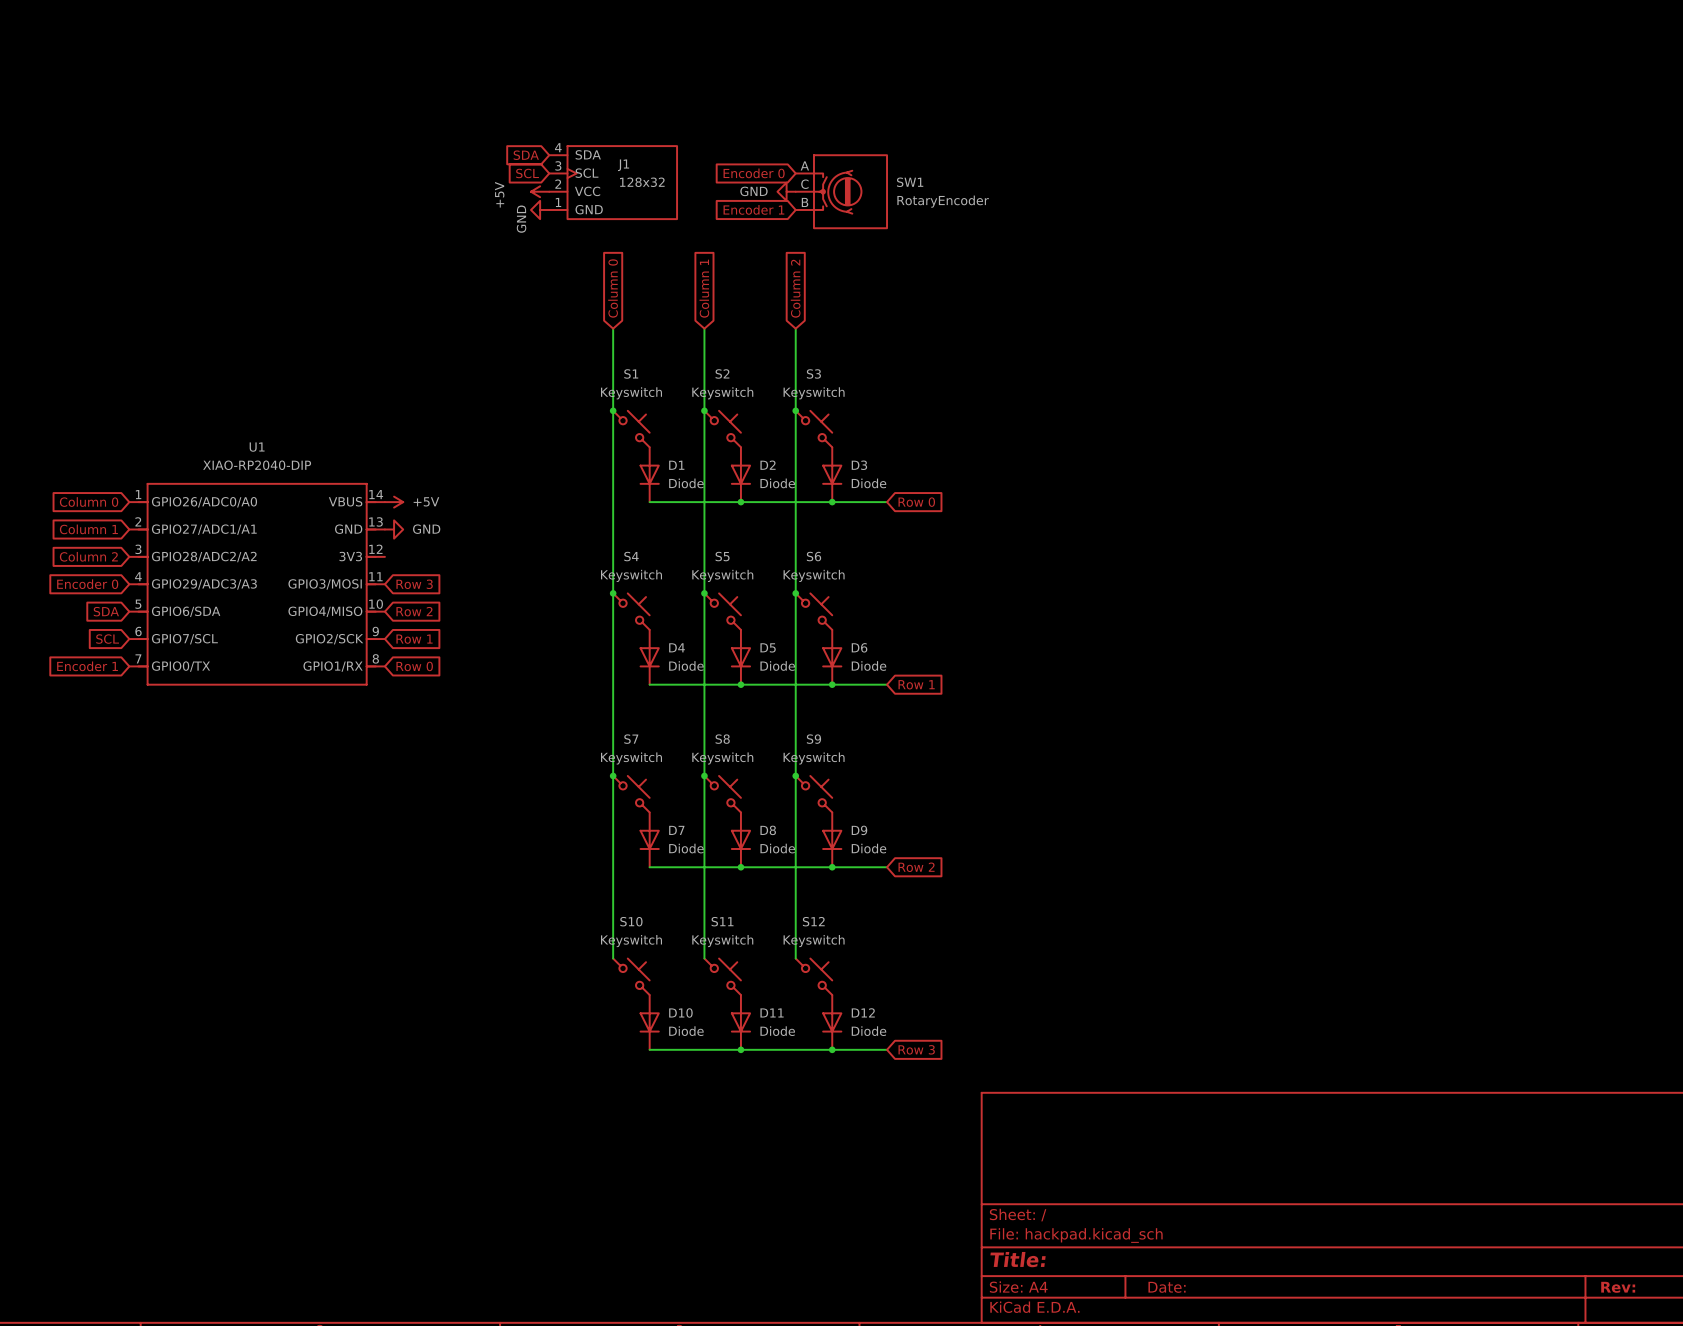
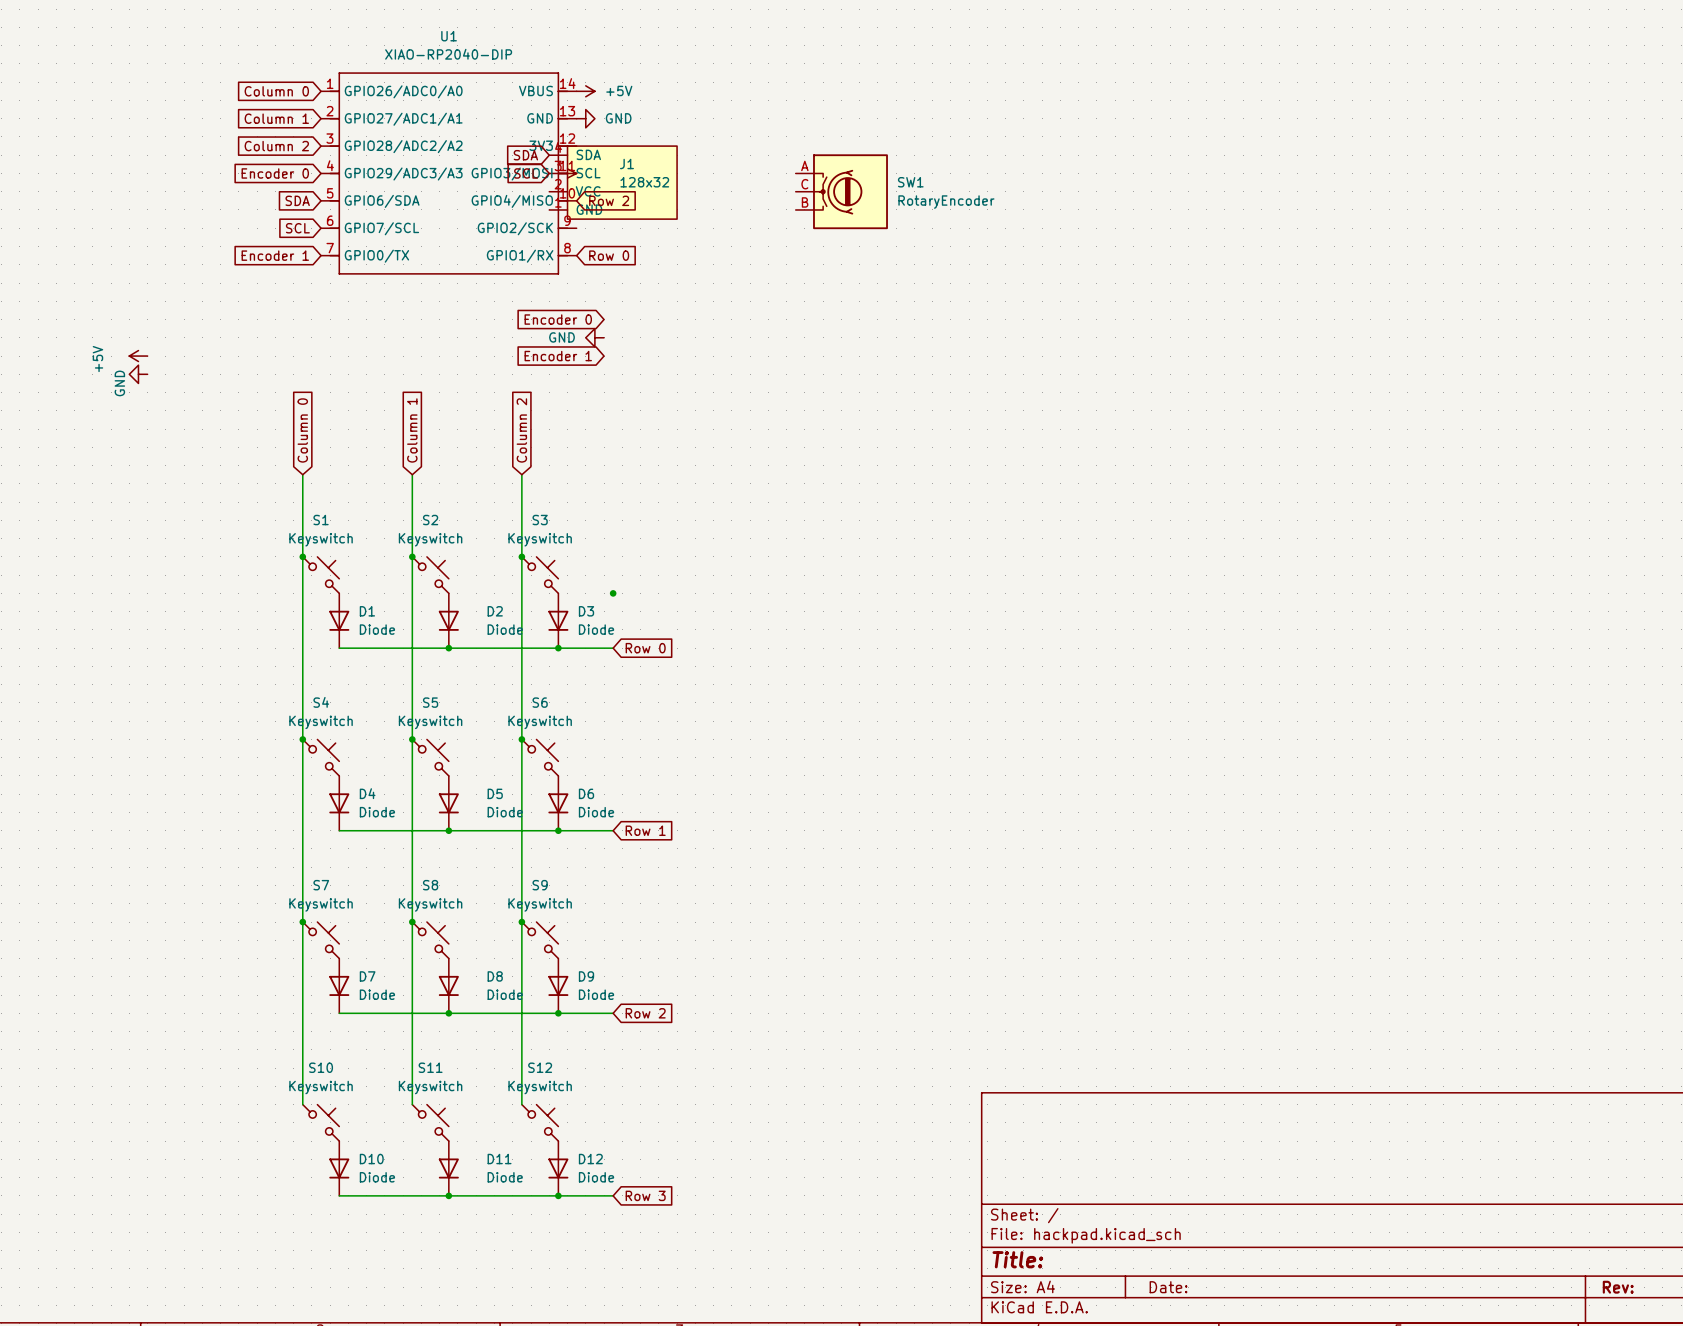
global label: none -> Column 0 (276, 91)
global label: none -> Column 1 (276, 118)
power symbol: none -> GND (585, 118)
global label: none -> Column 2 (276, 146)
global label: none -> Encoder 0 (275, 173)
global label: Encoder 0 (754, 173) -> none
power symbol rotation: 0° (540, 191) -> 180° (585, 91)
power symbol position: +5V (540, 191) -> +5V (585, 91)
power symbol: GND (786, 191) -> none
global label: none -> SDA (297, 200)
global label: none -> Row 2 (609, 200)
power symbol: GND (540, 209) -> none
global label: Encoder 1 (753, 209) -> none
global label: none -> SCL (297, 228)
global label: none -> Encoder 1 (275, 255)
global label: none -> Row 0 (609, 255)
global label: Column 0 (613, 288) -> none
global label: Column 1 (704, 288) -> none
global label: Column 2 (795, 288) -> none
global label: none -> Encoder 0 (558, 319)
wire: (613, 328) (613, 958) -> (521, 474) (521, 1104)
wire: (704, 328) (704, 958) -> none
wire: (795, 328) (795, 958) -> none
power symbol: none -> GND (594, 337)
global label: none -> Encoder 1 (558, 356)
power symbol: none -> +5V (138, 356)
power symbol: none -> GND (138, 374)
junction: (613, 410) -> none
junction: (704, 410) -> none
junction: (795, 410) -> none
S1 position: (631, 429) -> (321, 575)
S2 position: (722, 429) -> (430, 575)
S3 position: (813, 429) -> (540, 575)
global label: none -> Column 0 (302, 430)
global label: none -> Column 1 (412, 430)
global label: none -> Column 2 (521, 430)
D2 name position: D2 (768, 465) -> D2 (495, 611)
wire: none -> (302, 474) (302, 1104)
wire: none -> (412, 474) (412, 1104)
D1 position: (649, 474) -> (339, 620)
D2 position: (740, 474) -> (448, 620)
D3 position: (832, 474) -> (558, 620)
D2 value position: Diode (777, 483) -> Diode (505, 629)
global label: Column 0 (89, 502) -> none
power symbol: +5V (394, 502) -> none
wire: (649, 502) (887, 502) -> none
junction: (740, 502) -> none
junction: (832, 502) -> none
global label: Row 0 (916, 502) -> none
global label: Column 1 (88, 529) -> none
power symbol: GND (394, 529) -> none
global label: Column 2 (88, 556) -> none
junction: none -> (302, 556)
junction: none -> (412, 556)
junction: none -> (521, 556)
global label: Encoder 0 (87, 584) -> none
U1 position: (257, 584) -> (448, 173)
global label: Row 3 (414, 584) -> none
junction: (704, 593) -> none
junction: (795, 593) -> none
global label: SDA (106, 611) -> none
global label: Row 2 (414, 611) -> none
S4 position: (631, 611) -> (321, 757)
S5 position: (722, 611) -> (430, 757)
S6 position: (813, 611) -> (540, 757)
global label: SCL (107, 639) -> none
global label: Row 1 (414, 639) -> none
D5 name position: D5 (768, 647) -> D5 (495, 793)
wire: none -> (339, 648) (613, 648)
junction: none -> (448, 648)
junction: none -> (558, 648)
global label: none -> Row 0 (645, 648)
D4 position: (649, 657) -> (339, 803)
D5 position: (740, 657) -> (448, 803)
D6 position: (832, 657) -> (558, 803)
D5 value position: Diode (777, 665) -> Diode (505, 812)
global label: Encoder 1 (87, 666) -> none
global label: Row 0 (414, 666) -> none
wire: (649, 684) (887, 684) -> none
junction: (740, 684) -> none
junction: (832, 684) -> none
global label: Row 1 (916, 684) -> none
junction: none -> (302, 739)
junction: none -> (412, 739)
junction: none -> (521, 739)
junction: (613, 775) -> none
junction: (704, 775) -> none
junction: (795, 775) -> none
S7 position: (631, 794) -> (321, 940)
S8 position: (722, 794) -> (430, 940)
S9 position: (813, 794) -> (540, 940)
wire: none -> (339, 830) (613, 830)
junction: none -> (448, 830)
junction: none -> (558, 830)
global label: none -> Row 1 (645, 830)
D8 name position: D8 (768, 830) -> D8 (495, 976)
D7 position: (649, 839) -> (339, 985)
D8 position: (740, 839) -> (448, 985)
D9 position: (832, 839) -> (558, 985)
D8 value position: Diode (777, 848) -> Diode (505, 994)
wire: (649, 867) (887, 867) -> none
junction: (740, 867) -> none
junction: (832, 867) -> none
global label: Row 2 (916, 867) -> none
junction: none -> (302, 922)
junction: none -> (412, 922)
junction: none -> (521, 922)
S10 position: (631, 976) -> (321, 1122)
S11 position: (722, 976) -> (430, 1122)
S12 position: (813, 976) -> (540, 1122)
D11 name position: D11 (772, 1012) -> D11 (499, 1159)
wire: none -> (339, 1013) (613, 1013)
junction: none -> (448, 1013)
junction: none -> (558, 1013)
global label: none -> Row 2 (645, 1013)
D10 position: (649, 1022) -> (339, 1168)
D11 position: (740, 1022) -> (448, 1168)
D12 position: (832, 1022) -> (558, 1168)
D11 value position: Diode (777, 1031) -> Diode (505, 1177)
wire: (649, 1049) (887, 1049) -> none
junction: (740, 1049) -> none
junction: (832, 1049) -> none
global label: Row 3 (916, 1049) -> none
wire: none -> (339, 1195) (613, 1195)
junction: none -> (448, 1195)
junction: none -> (558, 1195)
global label: none -> Row 3 (645, 1195)

